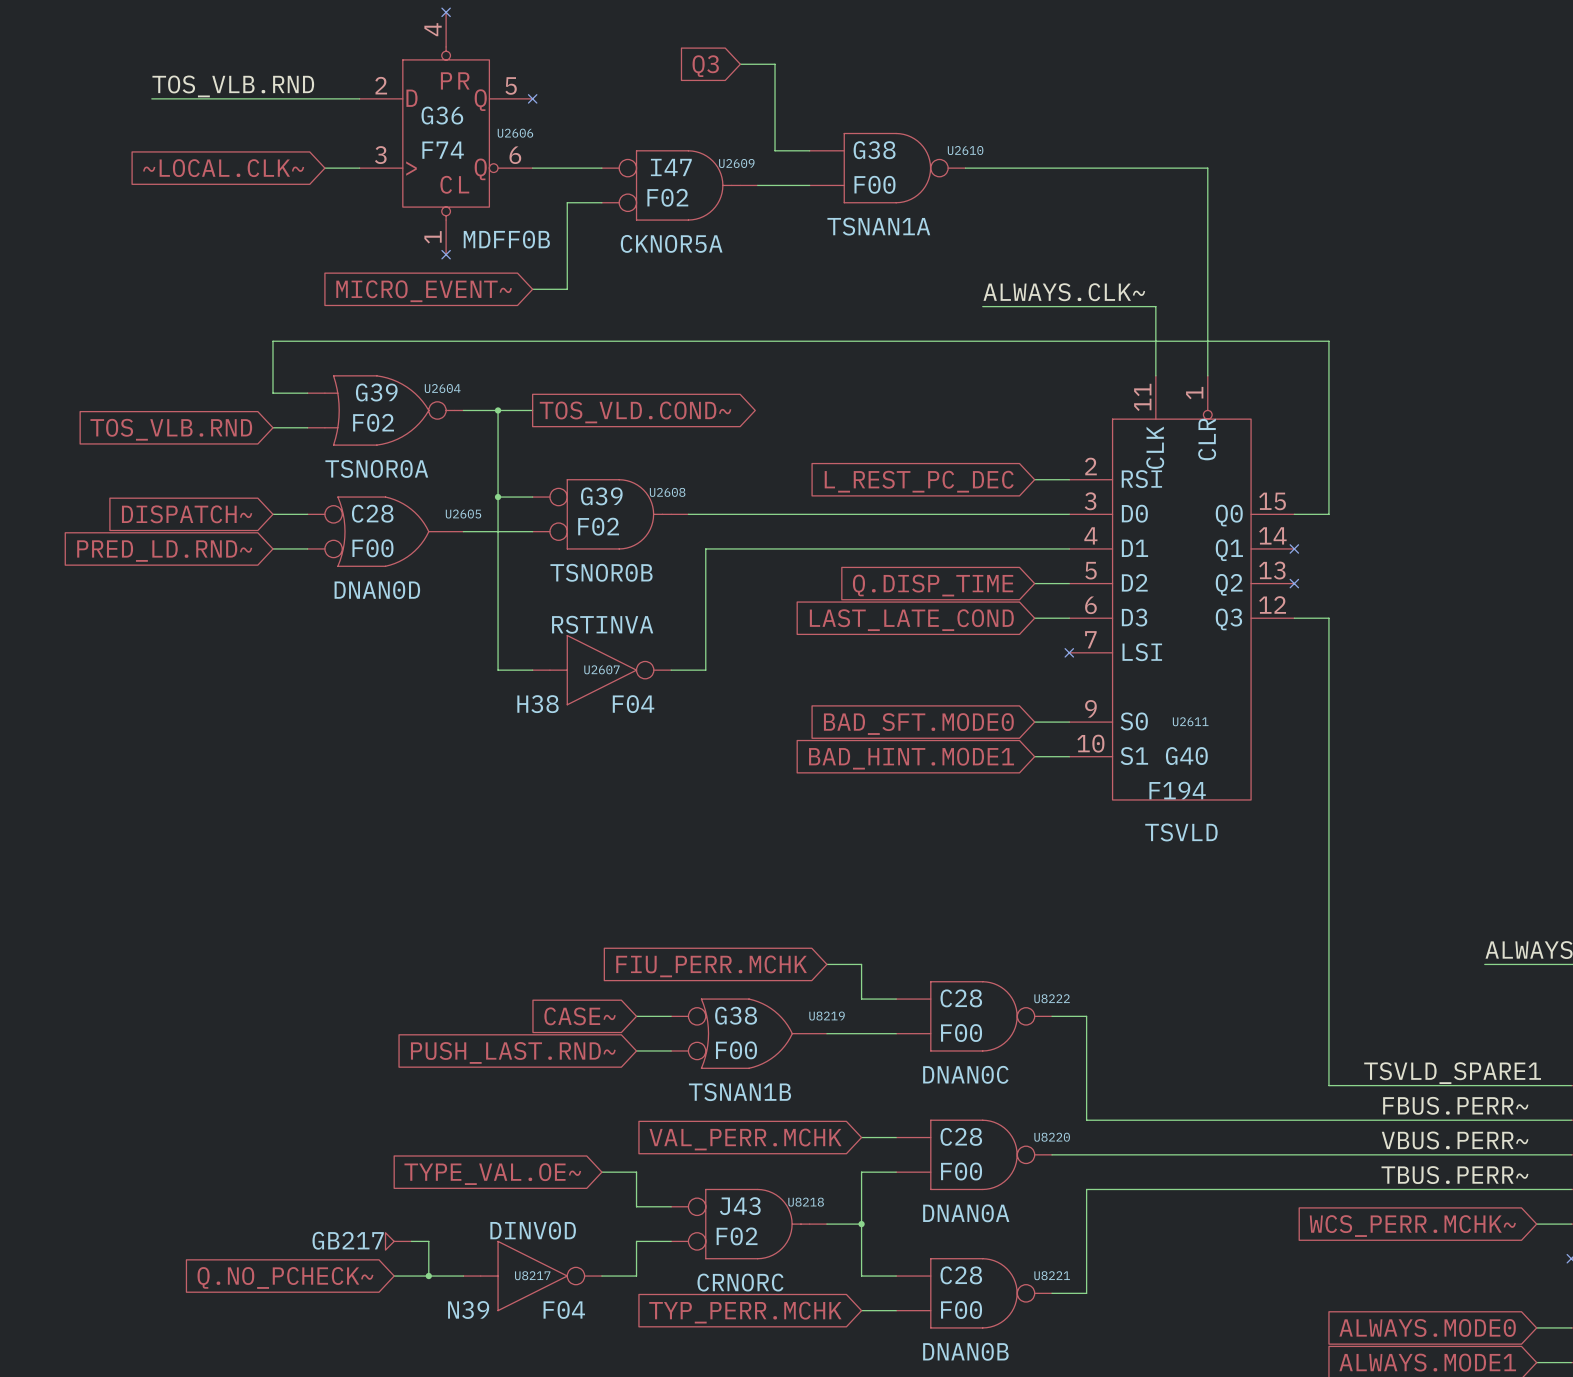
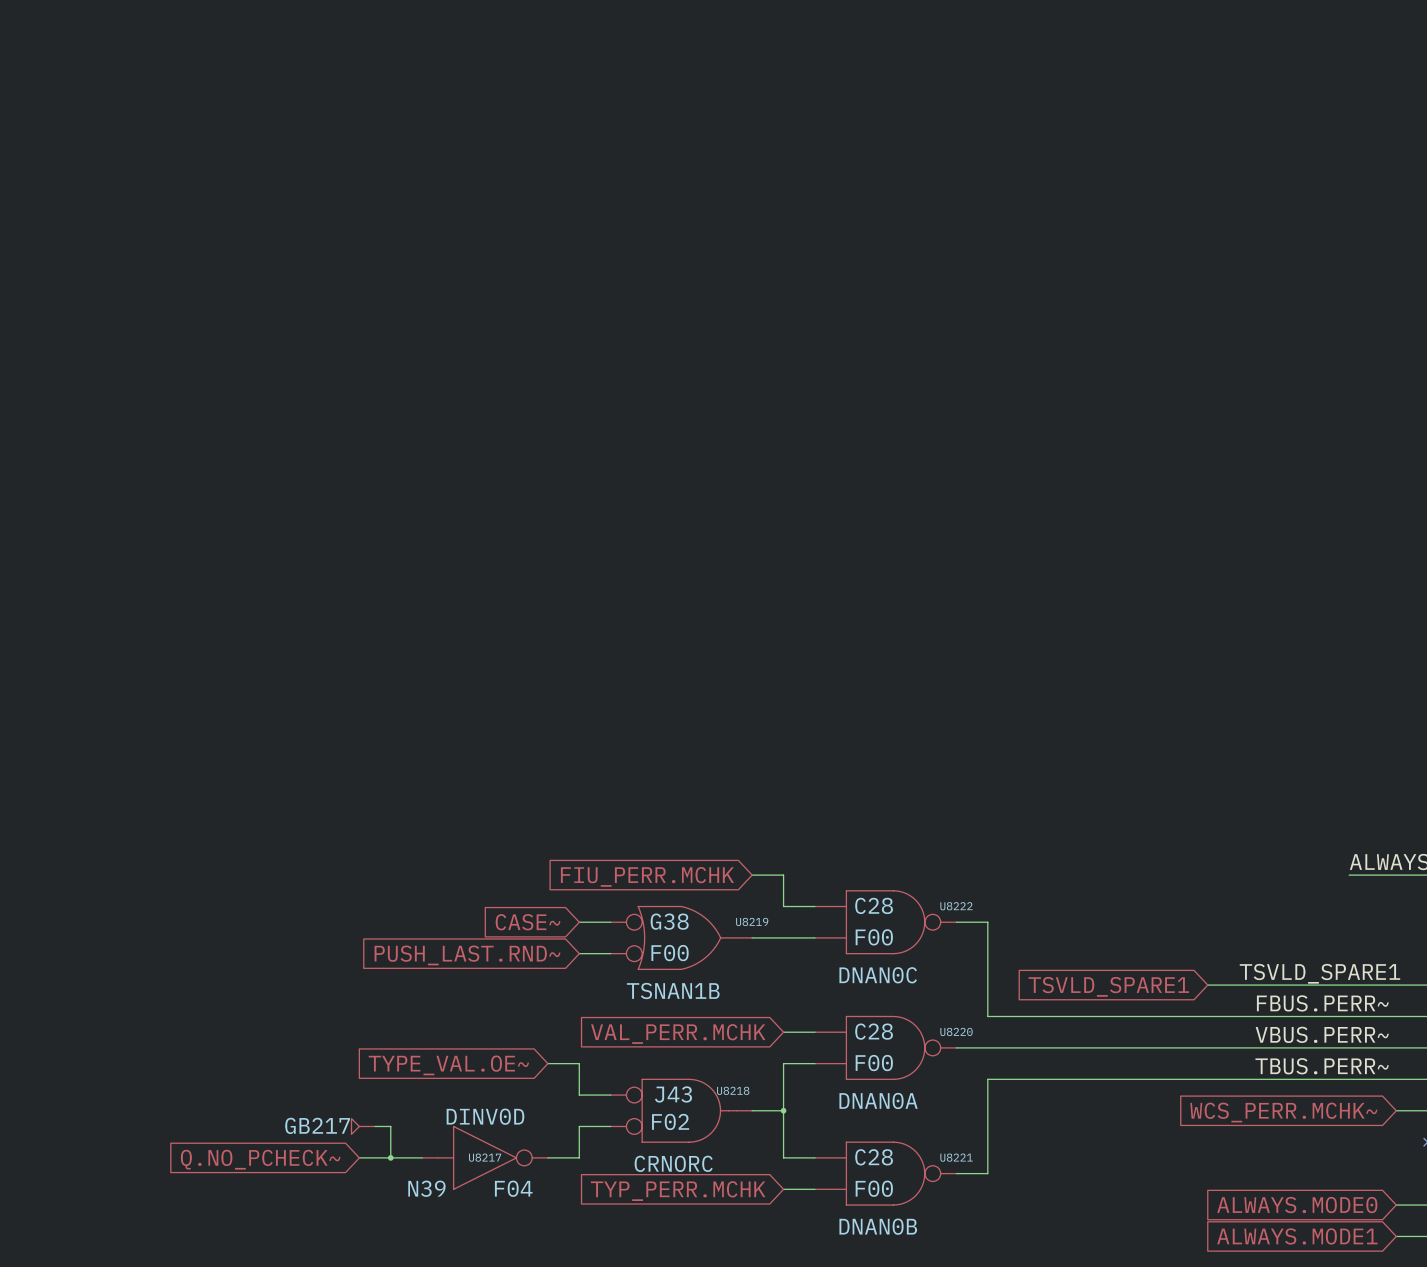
no-connect mark: (446, 12) -> none
wire: (740, 64) (775, 64) (775, 150) (809, 150) -> none
global label: Q3 (705, 66) -> none
label: TOS_VLB.RND (233, 86) -> none
wire: (151, 98) (359, 98) -> none
no-connect mark: (532, 98) -> none
U2606: F74 (446, 133) -> none
global label: ~LOCAL.CLK~ (223, 168) -> none
wire: (324, 168) (359, 168) -> none
wire: (532, 168) (601, 168) -> none
U2610: F00 (887, 168) -> none
wire: (965, 168) (1207, 168) (1207, 375) -> none
U2609: F02 (679, 185) -> none
wire: (757, 185) (809, 185) -> none
wire: (601, 202) (567, 202) (567, 289) (532, 289) -> none
no-connect mark: (446, 254) -> none
global label: MICRO_EVENT~ (424, 291) -> none
label: ALWAYS.CLK~ (1064, 292) -> none
wire: (982, 306) (1155, 306) (1155, 375) -> none
wire: (307, 393) (272, 393) (272, 341) (1328, 341) (1328, 514) (1294, 514) -> none
U2604: F02 (385, 410) -> none
wire: (463, 410) (532, 410) -> none
wire: (498, 410) (498, 670) (532, 670) -> none
junction: (498, 410) -> none
global label: TOS_VLD.COND~ (635, 412) -> none
wire: (272, 427) (307, 427) -> none
global label: TOS_VLB.RND (171, 429) -> none
wire: (1034, 479) (1069, 479) -> none
global label: L_REST_PC_DEC (919, 481) -> none
wire: (498, 497) (532, 497) -> none
junction: (498, 497) -> none
global label: DISPATCH~ (187, 514) -> none
wire: (272, 514) (307, 514) -> none
U2608: F02 (610, 514) -> none
wire: (688, 514) (1069, 514) -> none
U2605: F00 (385, 531) -> none
wire: (463, 531) (532, 531) -> none
wire: (272, 548) (307, 548) -> none
wire: (1069, 548) (705, 548) (705, 670) (671, 670) -> none
no-connect mark: (1294, 548) -> none
global label: PRED_LD.RND~ (164, 551) -> none
wire: (1034, 583) (1069, 583) -> none
no-connect mark: (1294, 583) -> none
global label: Q.DISP_TIME (933, 585) -> none
U2611: F194 (1181, 587) -> none
wire: (1034, 618) (1069, 618) -> none
wire: (1294, 618) (1328, 618) (1328, 1085) -> none
global label: LAST_LATE_COND (911, 620) -> none
no-connect mark: (1069, 652) -> none
U2607: F04 (601, 670) -> none
wire: (1034, 722) (1069, 722) -> none
global label: BAD_SFT.MODE0 (918, 724) -> none
wire: (1034, 756) (1069, 756) -> none
global label: BAD_HINT.MODE1 (911, 758) -> none
global label: none -> TSVLD_SPARE1 (1108, 986)

